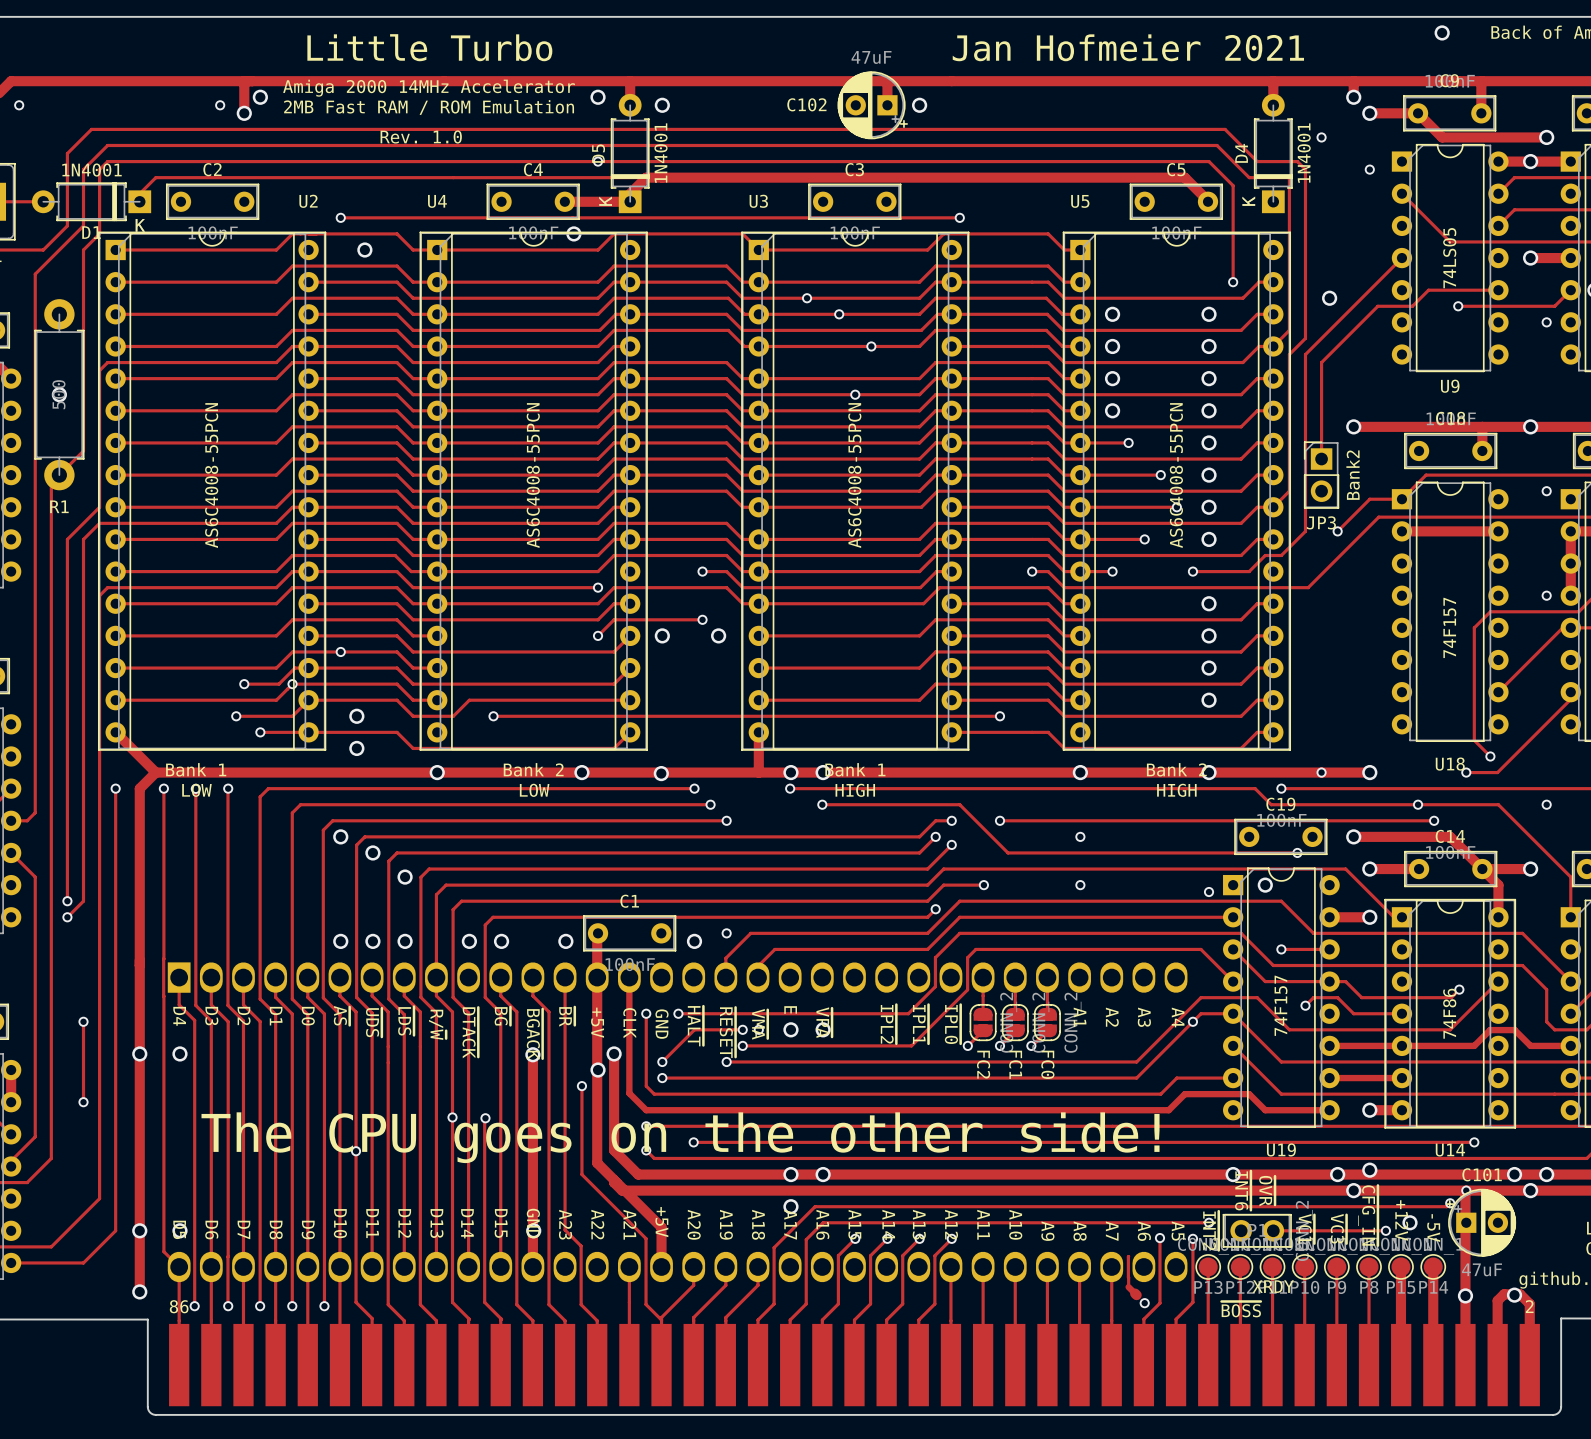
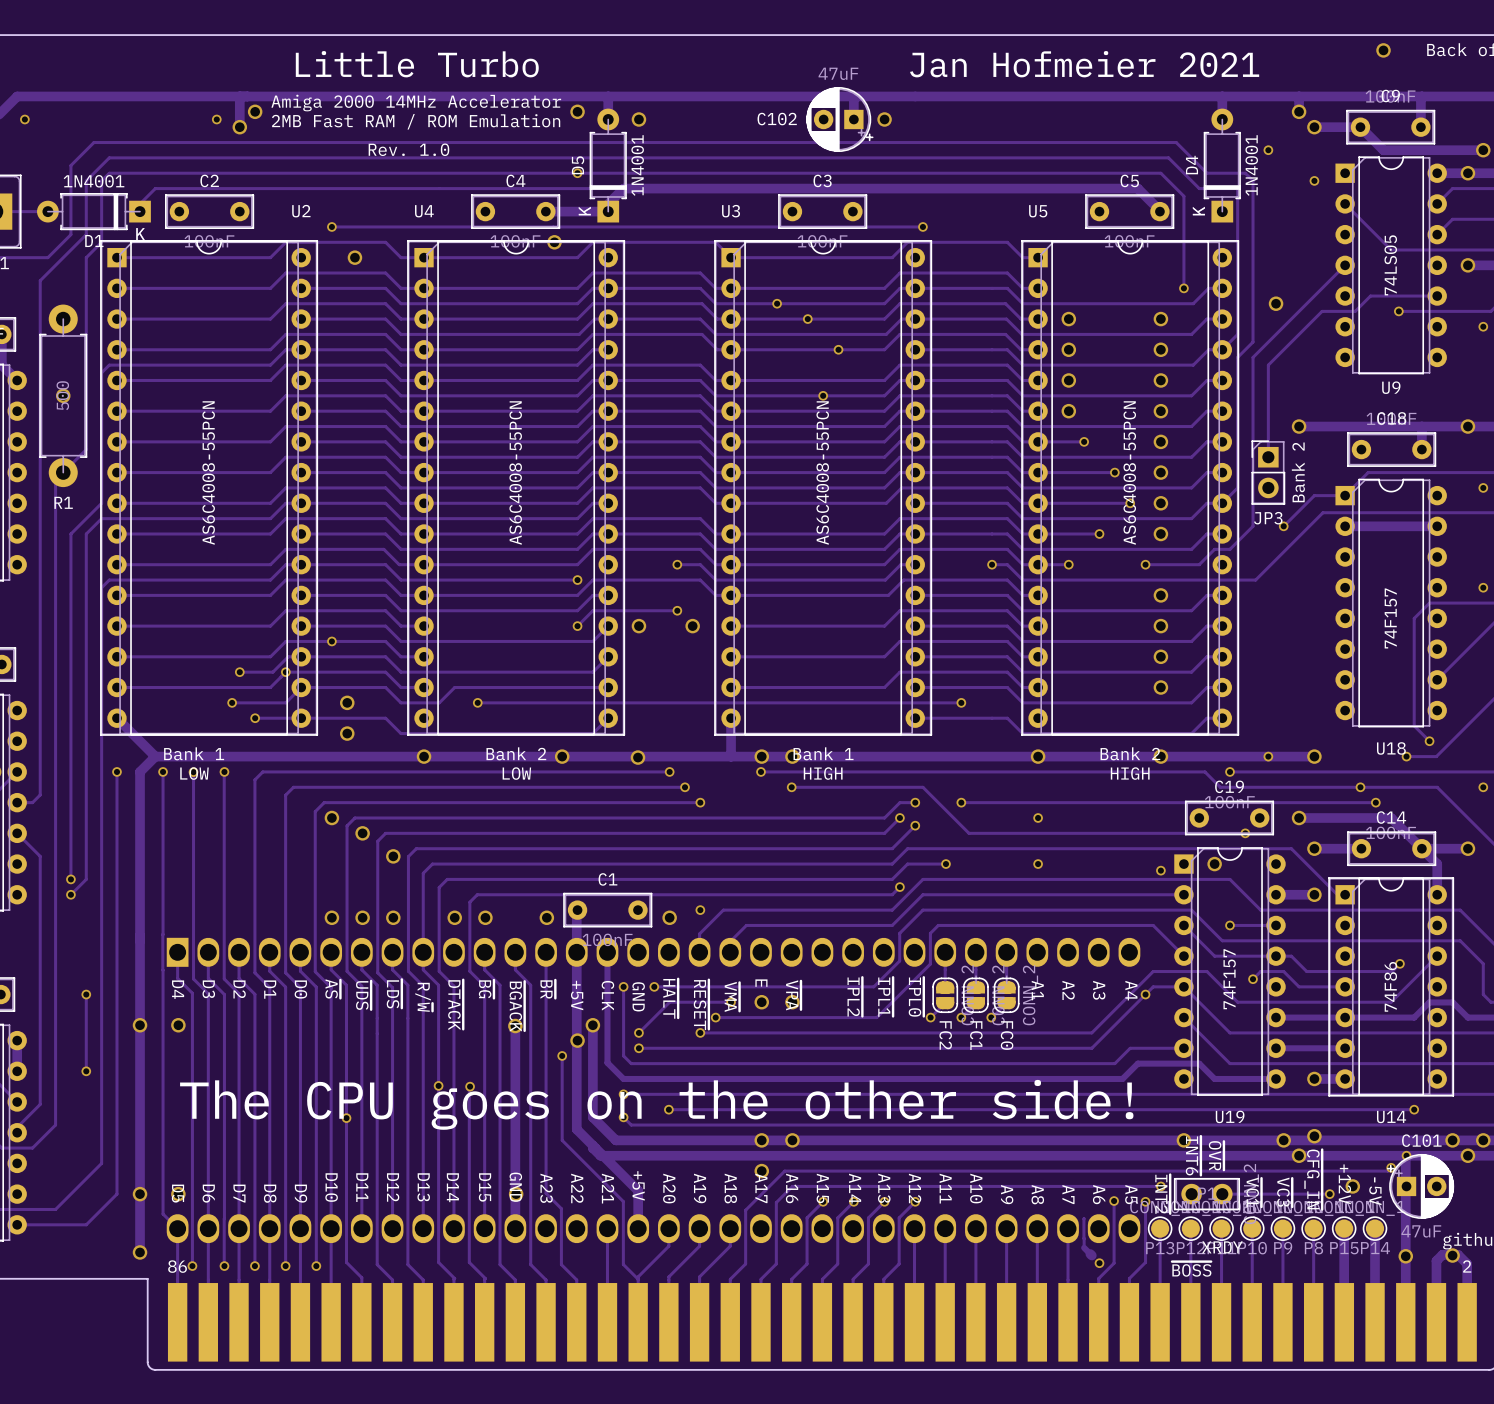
JP3 value: Bank2 (1353, 475) -> Bank 2 (1298, 472)
track: none -> (715, 1002) (731, 1002)
via: (742, 1029) -> none

